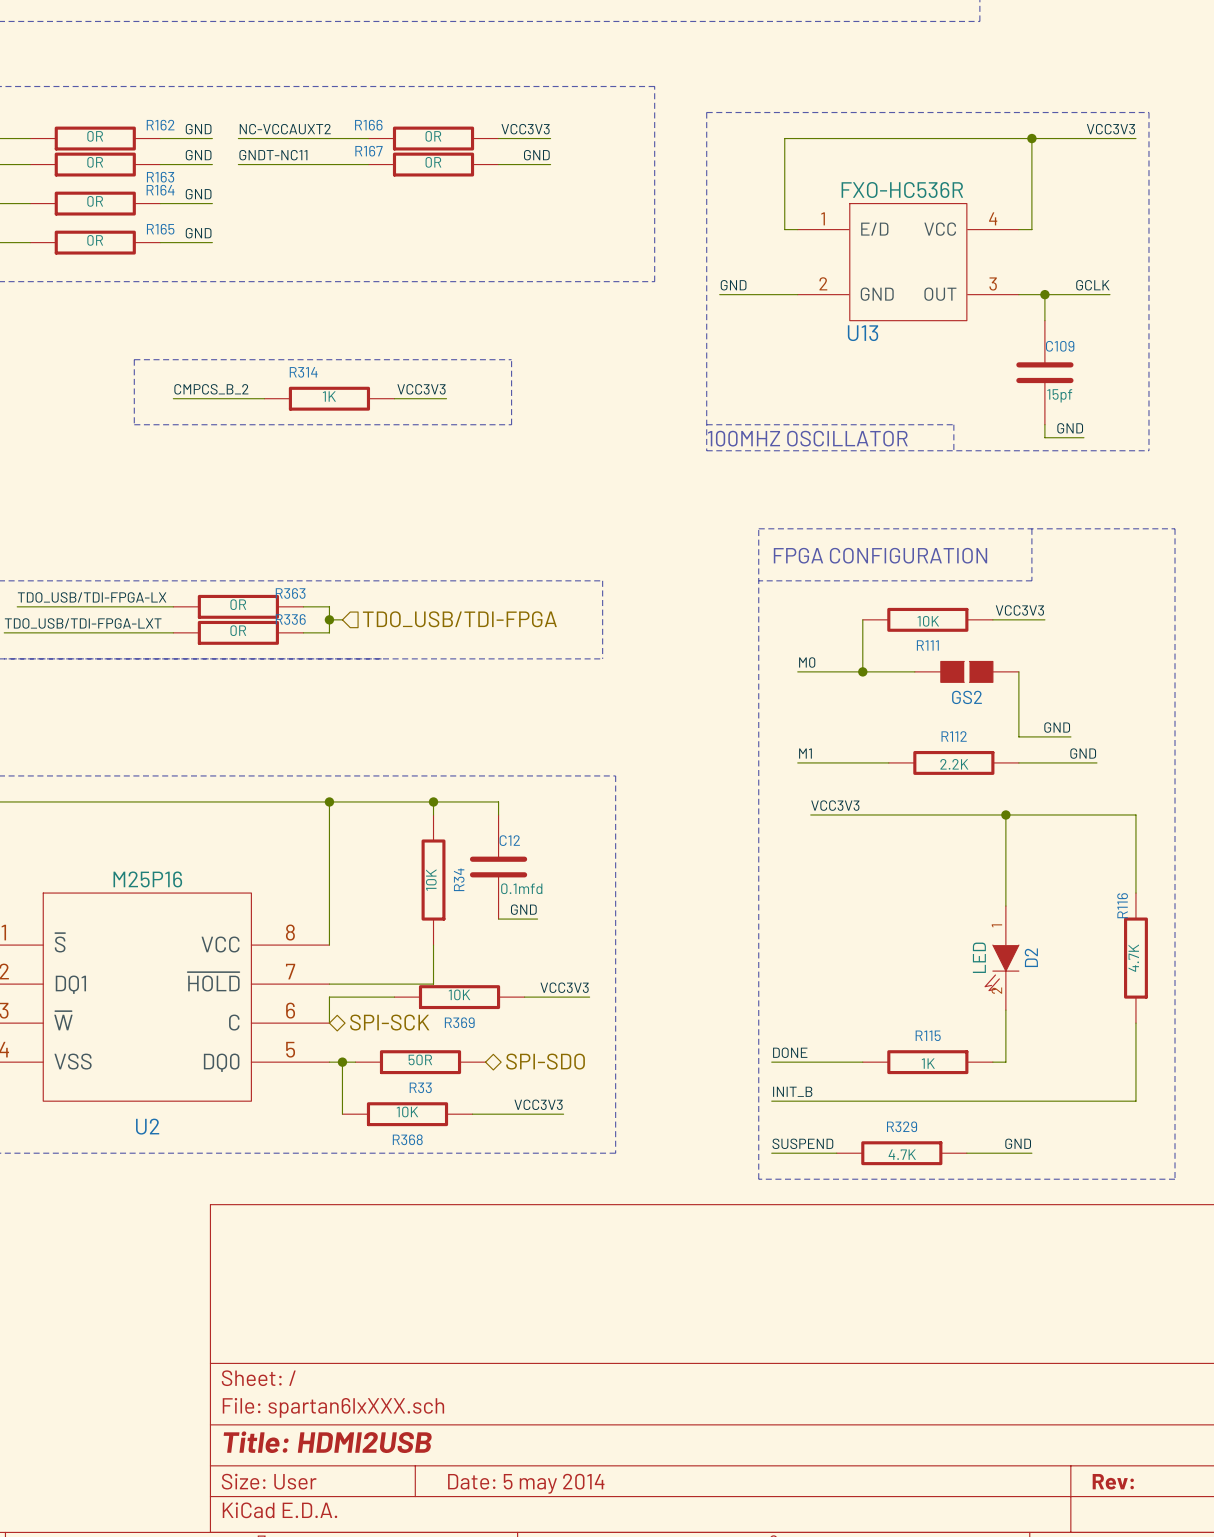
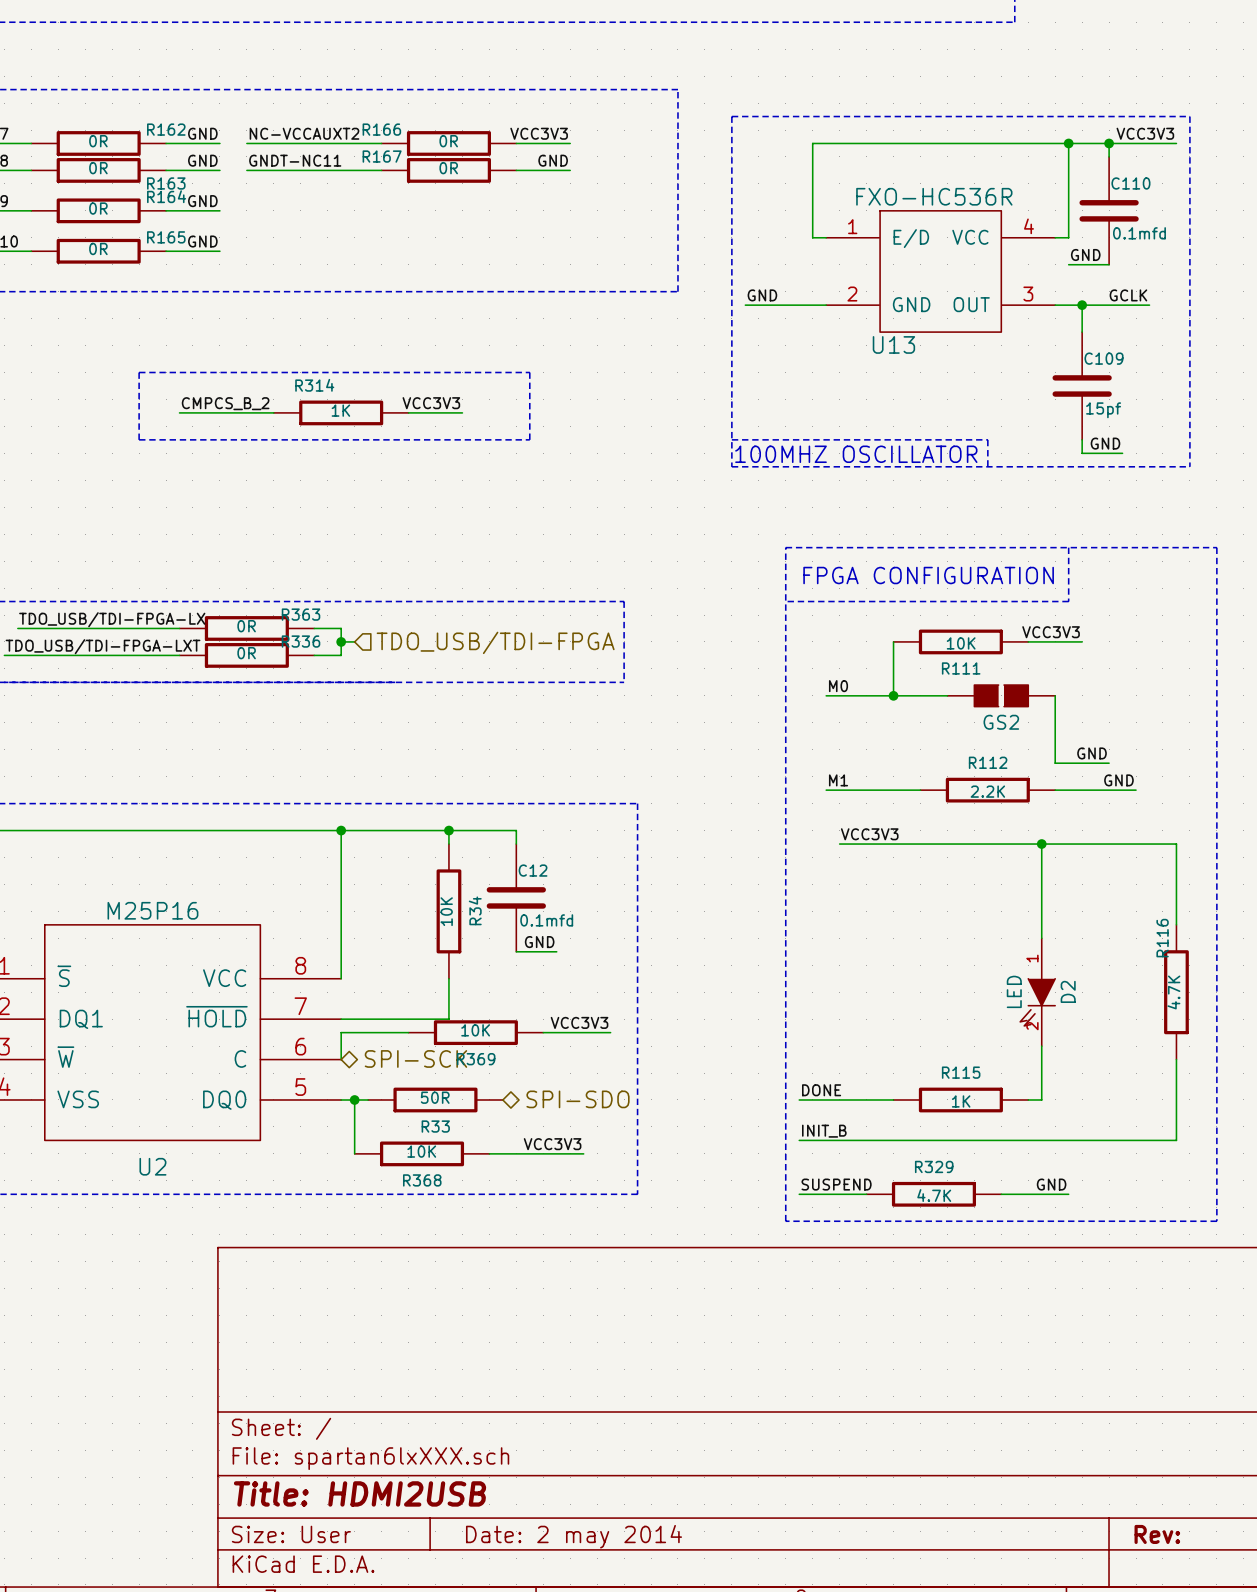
wire: none -> (1109, 143) (1109, 156)
junction: none -> (1109, 143)
C110: none -> 0.1mfd (1109, 210)
label: none -> GND (1085, 254)
wire: none -> (1068, 264) (1109, 264)
title block: Date: 5 may 2014 (526, 1483) -> Date: 2 may 2014 (573, 1536)

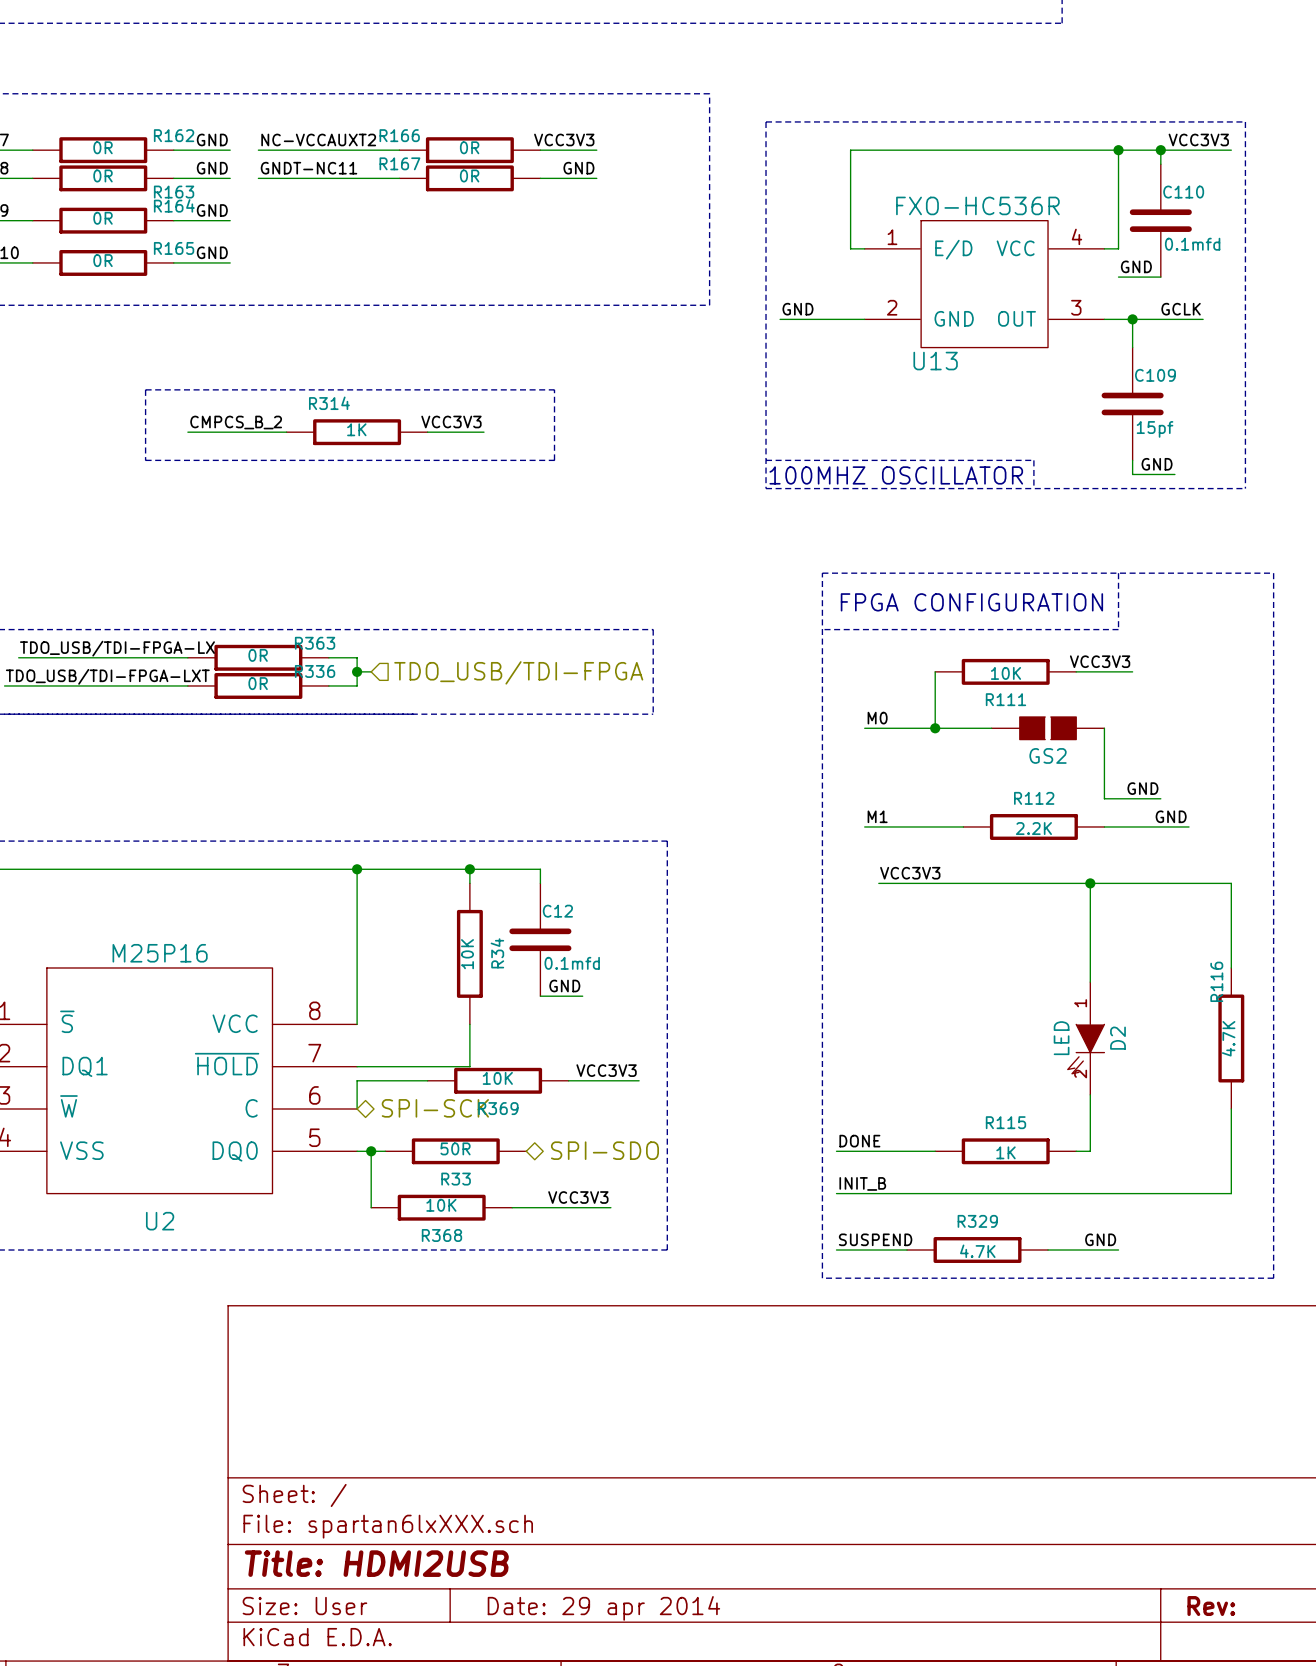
title block: Date: 2 may 2014 (573, 1536) -> Date: 29 apr 2014 (603, 1608)

